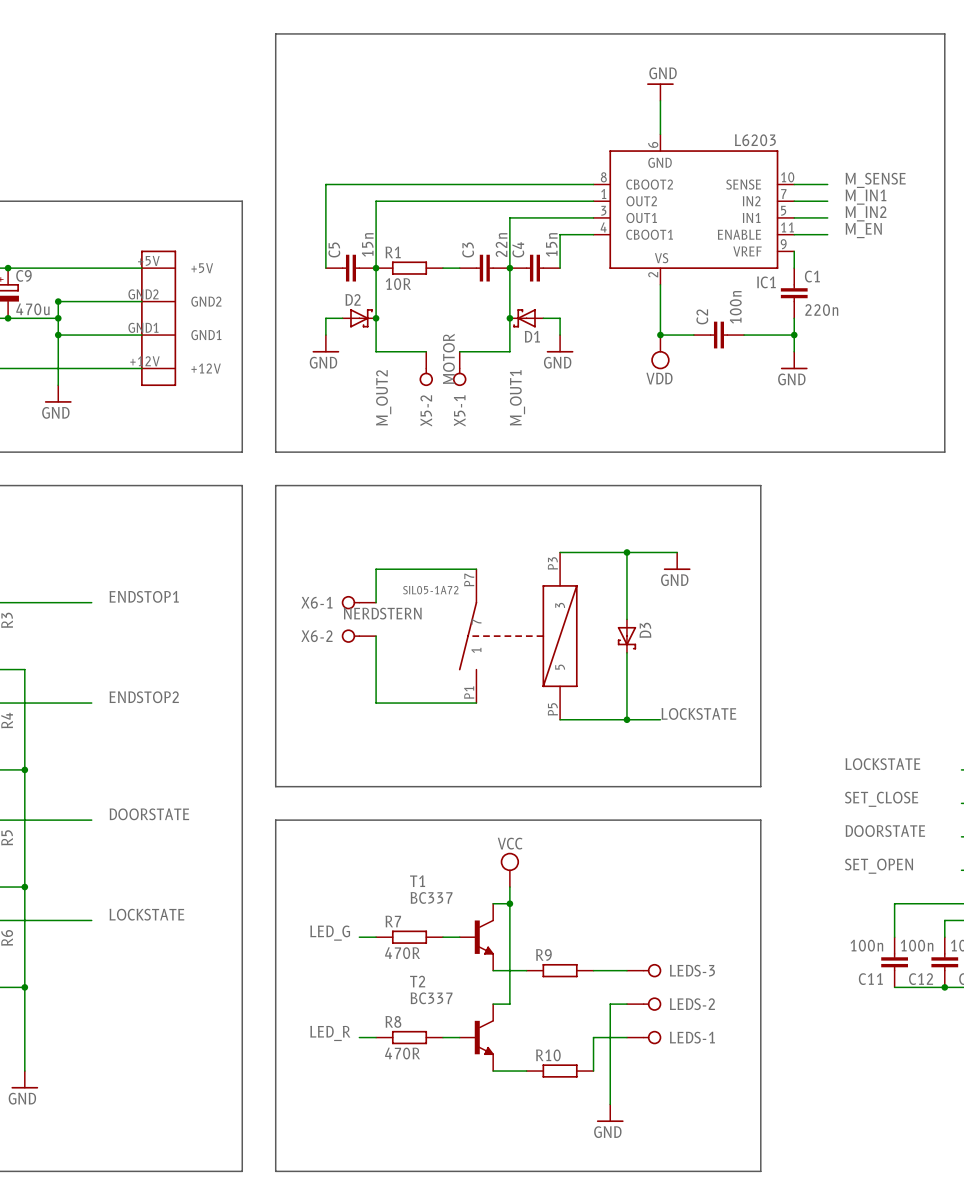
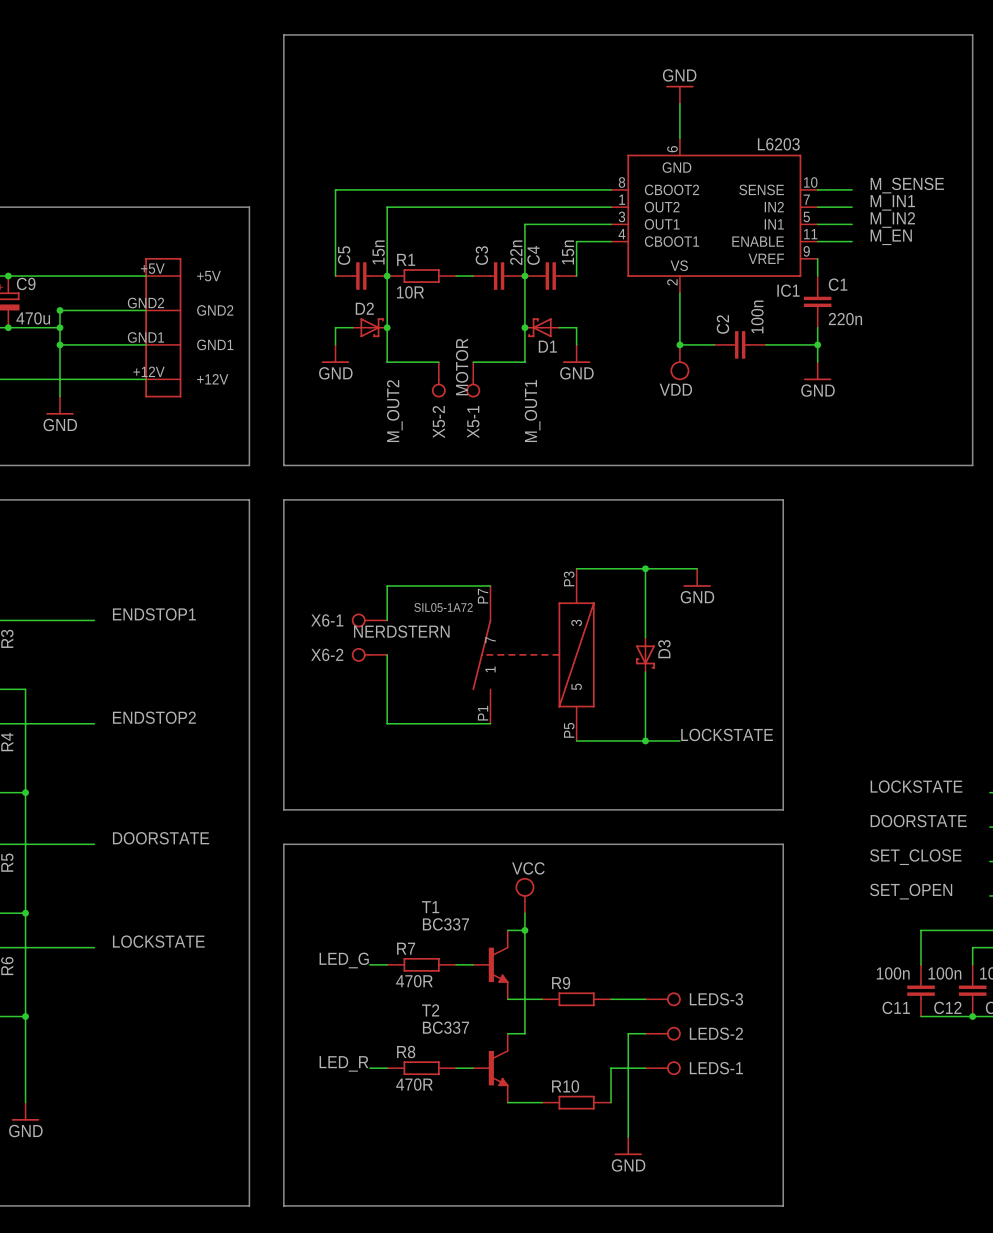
label: SET_CLOSE (881, 799) -> DOORSTATE (918, 821)
label: DOORSTATE (885, 831) -> SET_CLOSE (915, 857)

